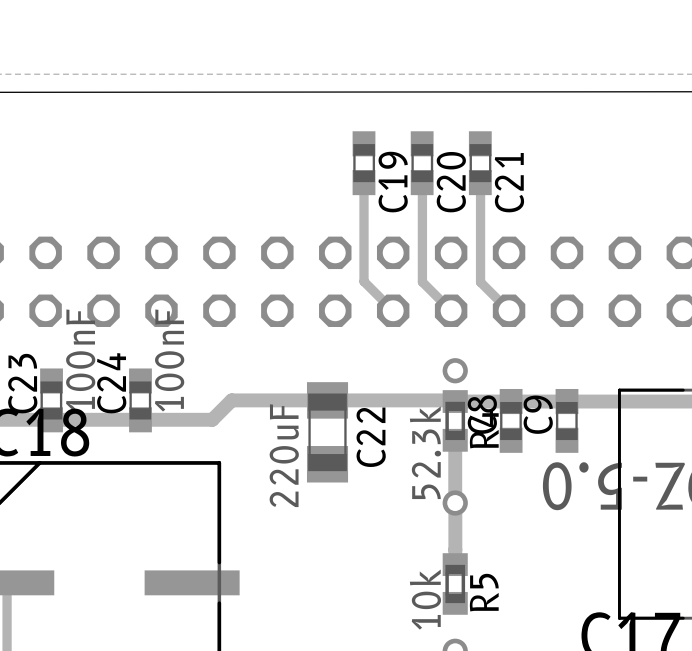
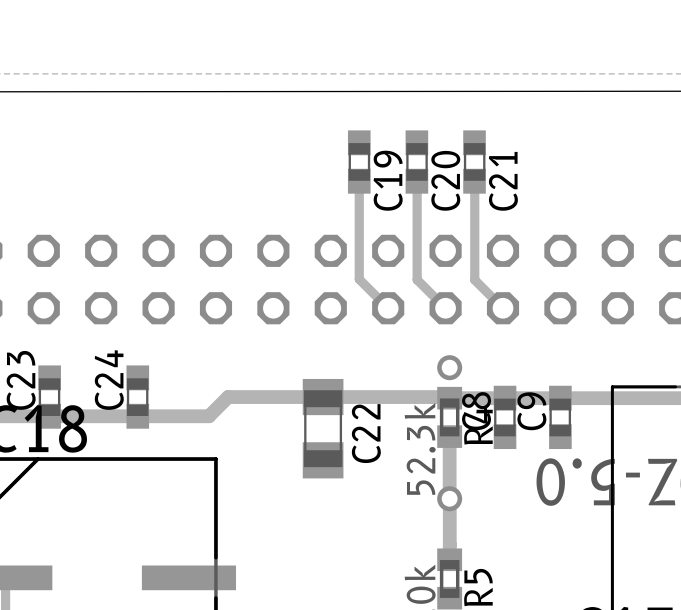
C23 value: 100nF (80, 360) -> none
C24 value: 100nF (169, 360) -> none
C22 value: 220uF (284, 455) -> none

